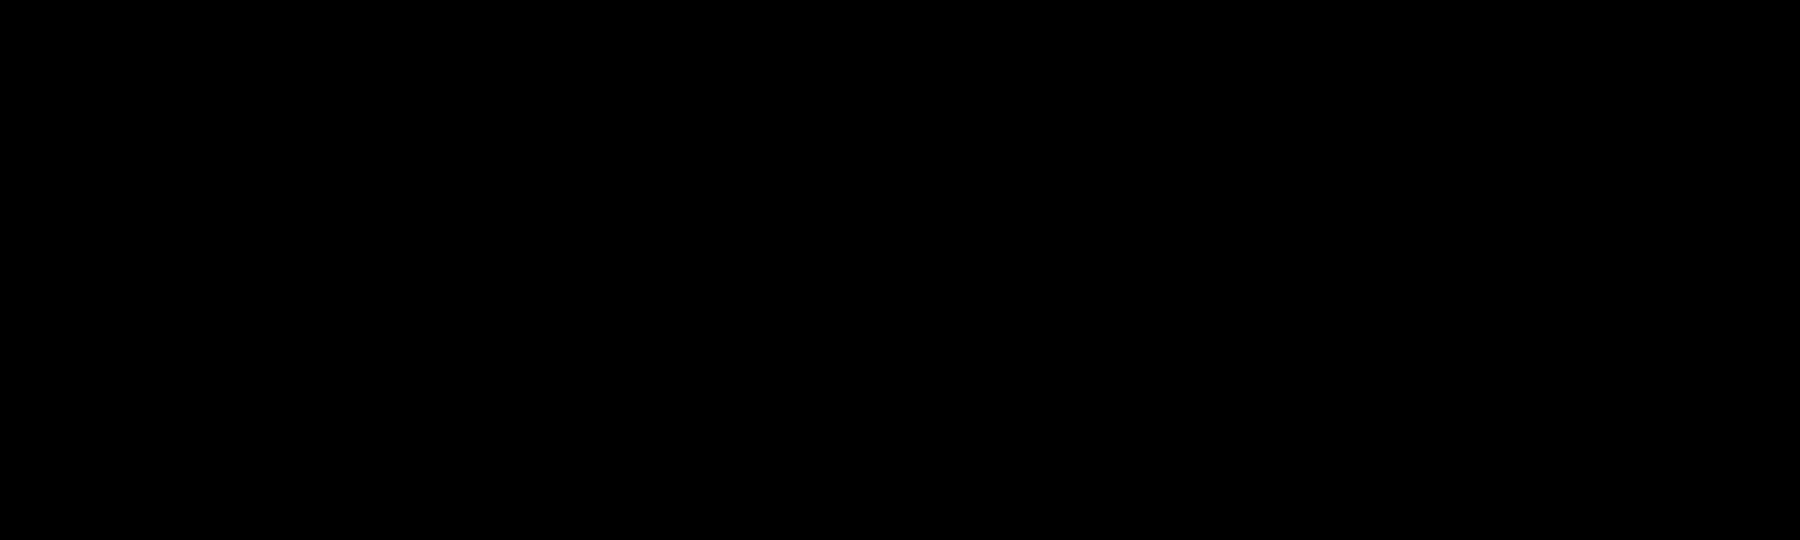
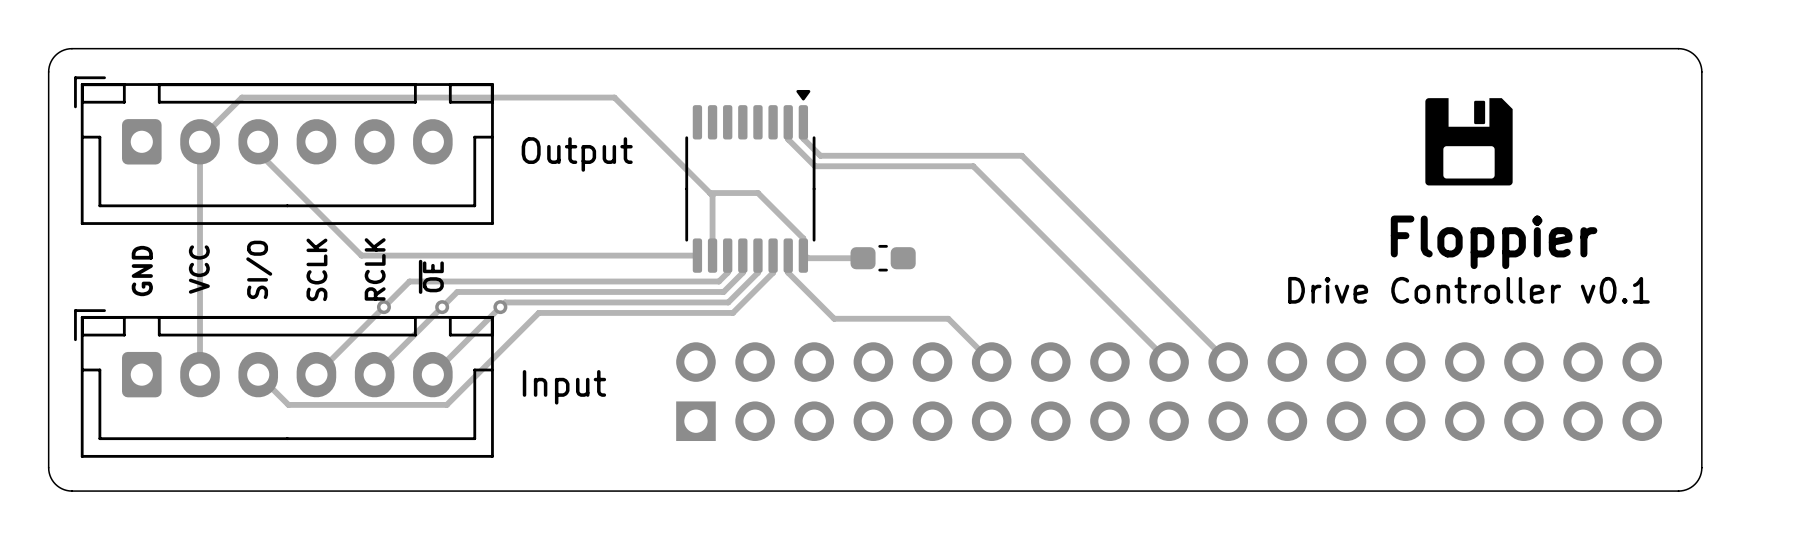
board edge: none -> (71, 48) (1683, 49) (1696, 57) (1701, 71) (1701, 472) (1693, 485) (1678, 491) (66, 490) (53, 482) (48, 467) (48, 71) (50, 61) (55, 55) (64, 49) (71, 48)
drawing: none -> [1425, 98, 1513, 186]
track: none -> (788, 122) (788, 139) (815, 166) (973, 166) (1169, 362)
track: none -> (803, 122) (803, 138) (820, 155) (1021, 155) (1228, 362)
track: none -> (258, 141) (258, 152) (361, 255) (697, 255)
part: none -> (283, 150)
text: none -> Output (577, 154)
part: none -> (750, 181)
track: none -> (709, 193) (757, 193) (803, 238) (803, 255) (807, 258) (863, 258)
text: none -> Floppier (1494, 242)
track: none -> (712, 255) (712, 195) (614, 97) (241, 97) (200, 139) (200, 374)
track: none -> (727, 255) (727, 272) (718, 281) (409, 281) (316, 374)
track: none -> (742, 255) (742, 272) (723, 291) (457, 291) (374, 374)
track: none -> (757, 255) (757, 272) (728, 302) (505, 302) (432, 374)
track: none -> (773, 255) (773, 272) (732, 312) (538, 312) (446, 404) (288, 404) (258, 374)
track: none -> (788, 255) (788, 272) (834, 318) (948, 318) (991, 362)
part: none -> (883, 258)
text: none -> VCC (199, 269)
text: none -> SI/O (259, 269)
text: none -> SCLK (316, 269)
text: none -> RCLK (375, 269)
text: none -> GND (142, 271)
text: none -> ~{OE} (431, 276)
text: none -> Drive Controller v0.1 (1468, 290)
via: none -> (383, 307)
via: none -> (442, 307)
via: none -> (500, 307)
part: none -> (283, 383)
text: none -> Input (564, 387)
part: none -> (1169, 391)

